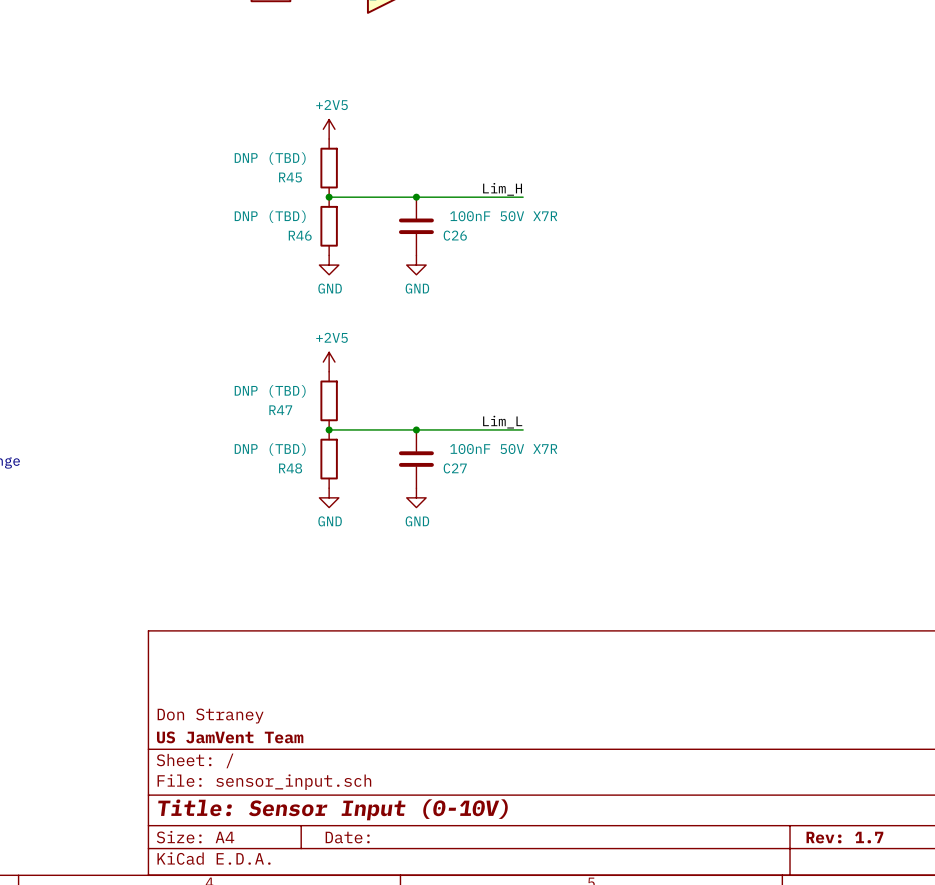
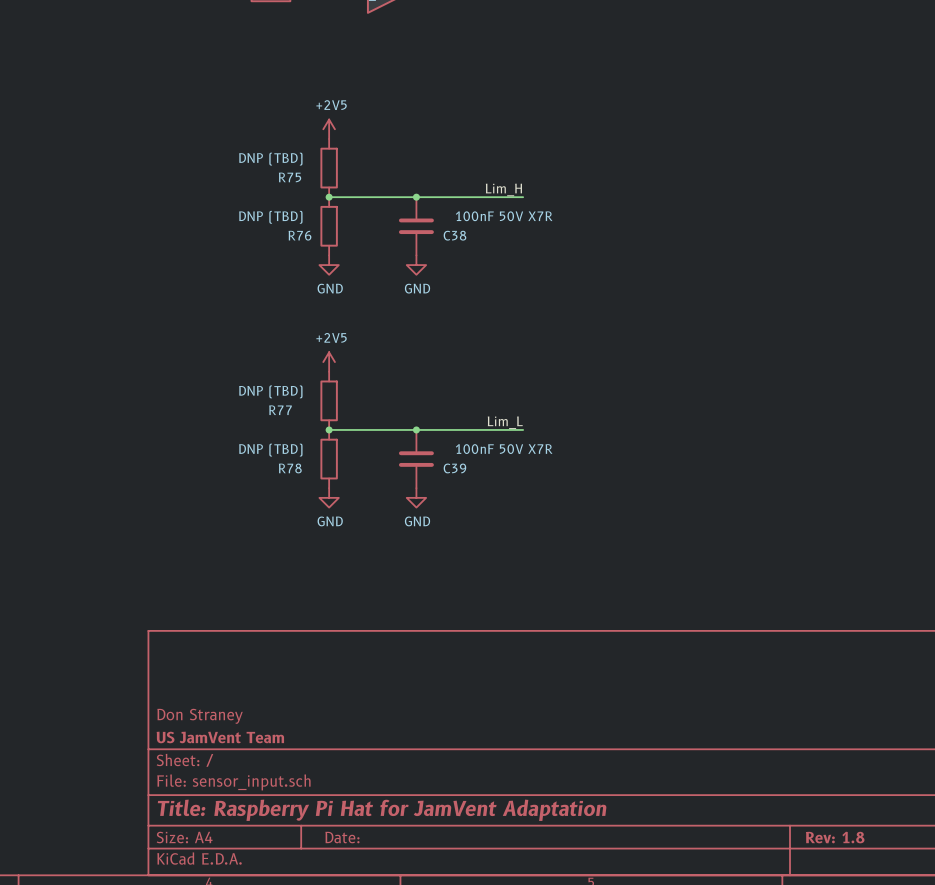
R45 name: R45 (290, 177) -> R75 (290, 177)
R46 name: R46 (300, 235) -> R76 (299, 235)
C26 name: C26 (455, 235) -> C38 (454, 235)
R47 name: R47 (280, 410) -> R77 (280, 410)
R48 name: R48 (290, 468) -> R78 (290, 468)
C27 name: C27 (455, 468) -> C39 (454, 468)
title block: Title: Sensor Input (0-10V) (333, 809) -> Title: Raspberry Pi Hat for JamVent Adaptation (382, 810)
title block: Rev: 1.7 (844, 837) -> Rev: 1.8 (835, 837)

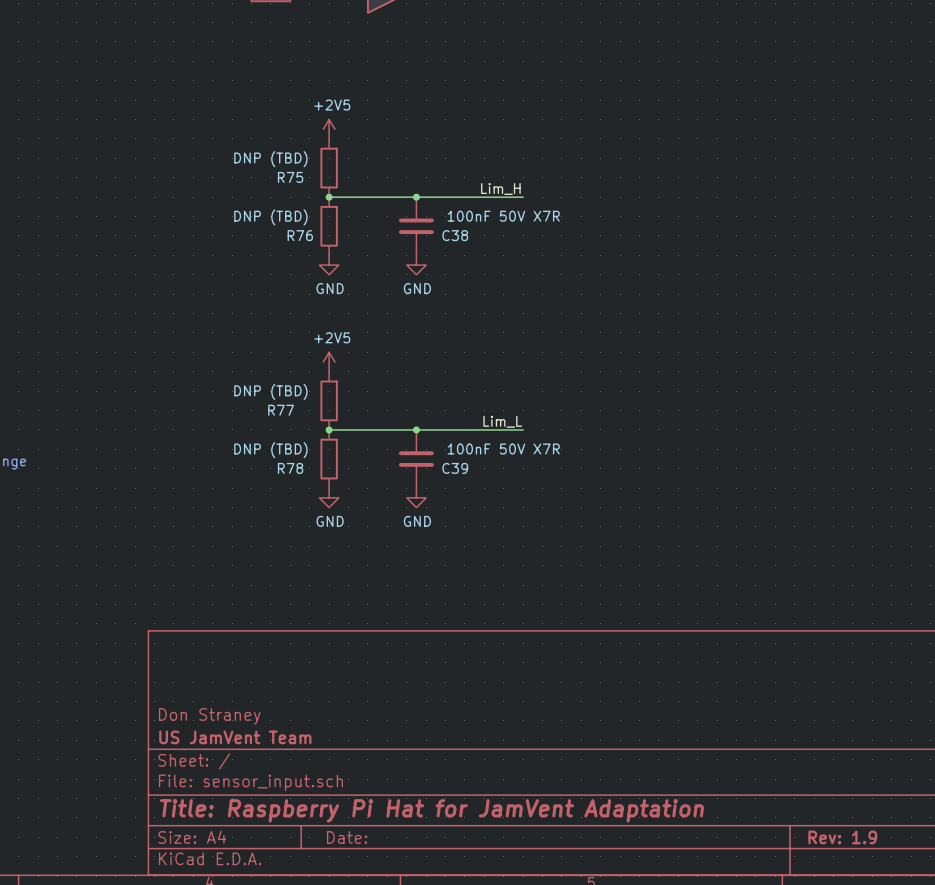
title block: Rev: 1.8 (835, 837) -> Rev: 1.9 (842, 837)

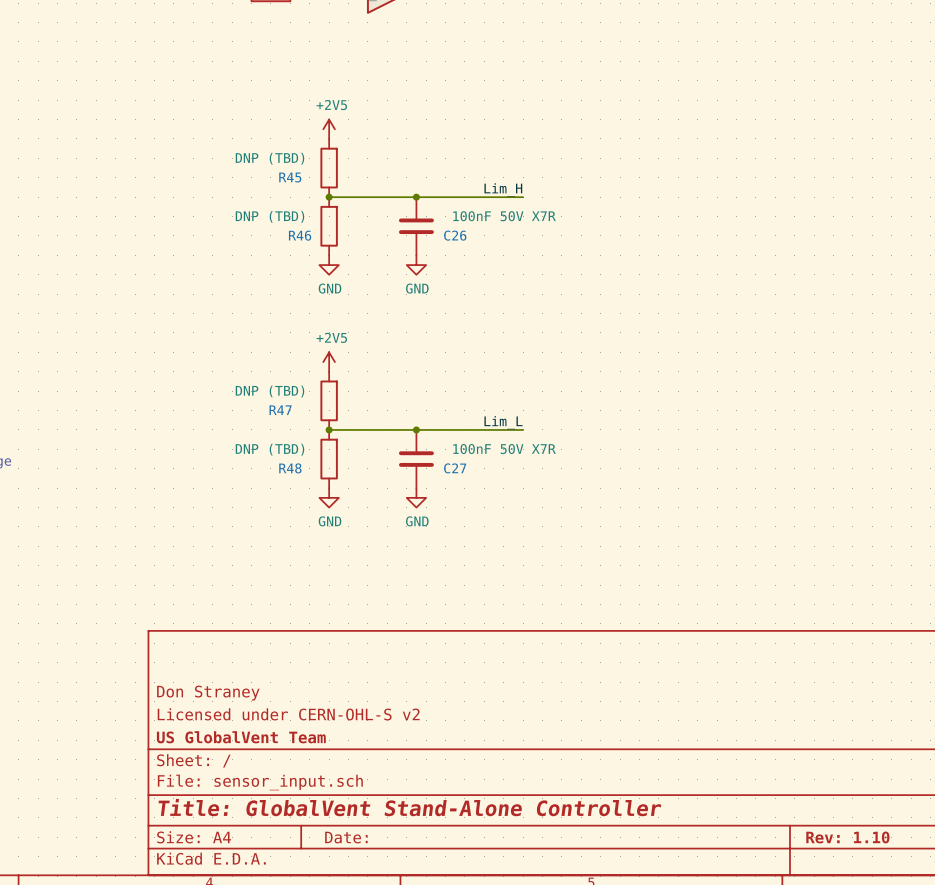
R75 name: R75 (290, 177) -> R45 (290, 177)
R76 name: R76 (300, 235) -> R46 (300, 235)
C38 name: C38 (455, 235) -> C26 (455, 235)
R77 name: R77 (281, 410) -> R47 (280, 410)
R78 name: R78 (290, 468) -> R48 (290, 468)
C39 name: C39 (455, 468) -> C27 (455, 468)
title block: none -> Don Straney (208, 693)
title block: Don Straney (209, 716) -> Licensed under CERN-OHL-S v2 (288, 714)
title block: US JamVent Team (235, 737) -> US GlobalVent Team (241, 737)
title block: Title: Raspberry Pi Hat for JamVent Adaptation (431, 810) -> Title: GlobalVent Stand-Alone Controller (409, 807)
title block: Rev: 1.9 (842, 837) -> Rev: 1.10 (847, 837)

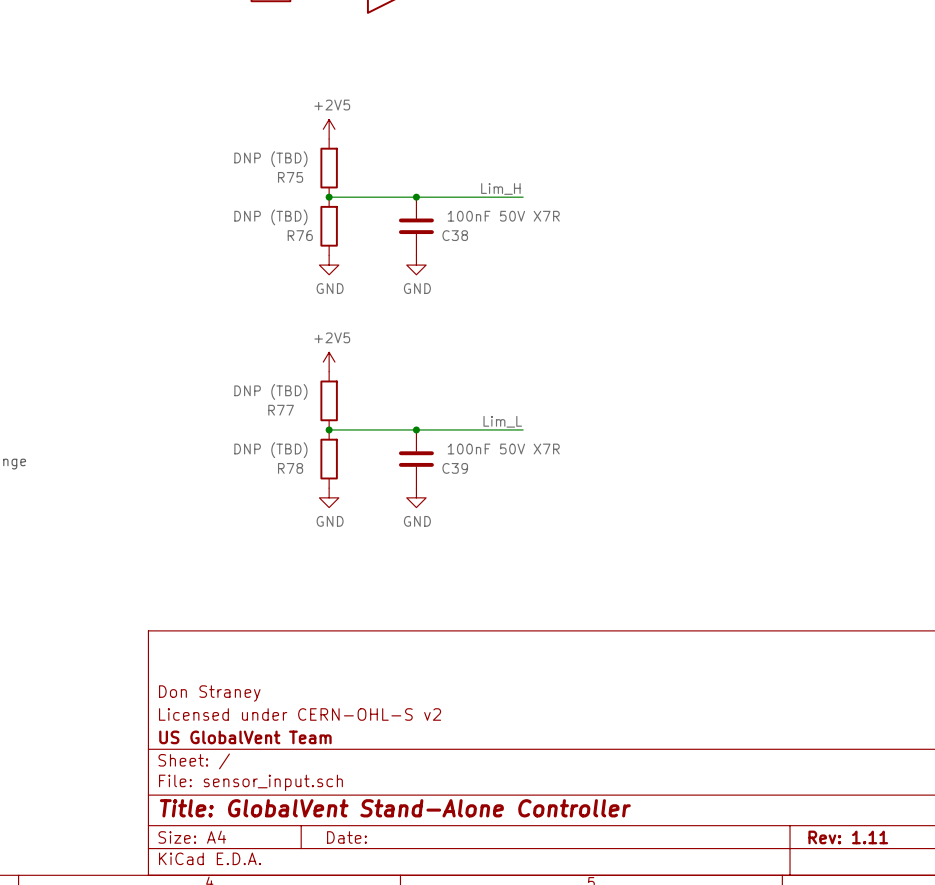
R45 name: R45 (290, 177) -> R75 (290, 177)
R46 name: R46 (300, 235) -> R76 (300, 235)
C26 name: C26 (455, 235) -> C38 (455, 235)
R47 name: R47 (280, 410) -> R77 (281, 410)
R48 name: R48 (290, 468) -> R78 (290, 468)
C27 name: C27 (455, 468) -> C39 (455, 468)
title block: Rev: 1.10 (847, 837) -> Rev: 1.11 (848, 837)

